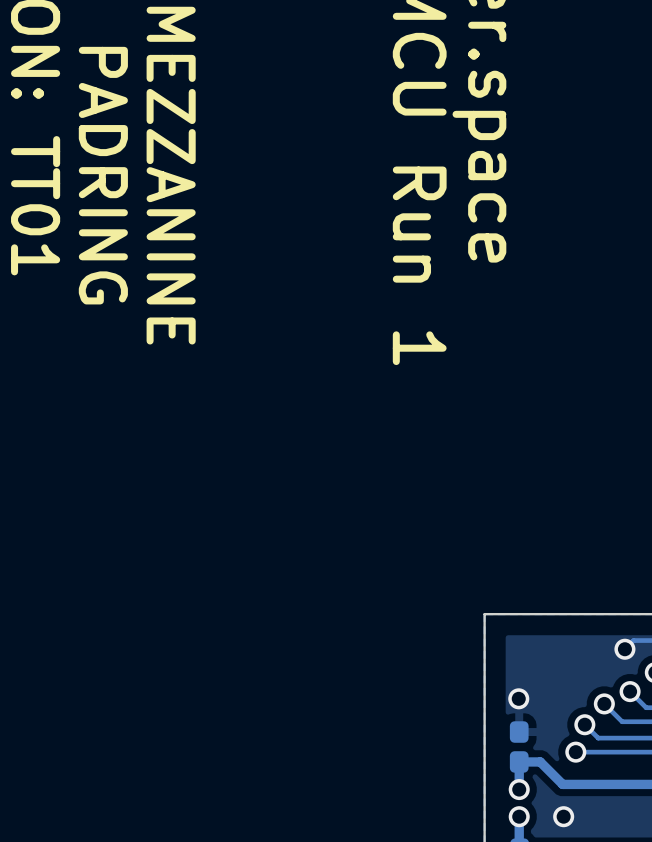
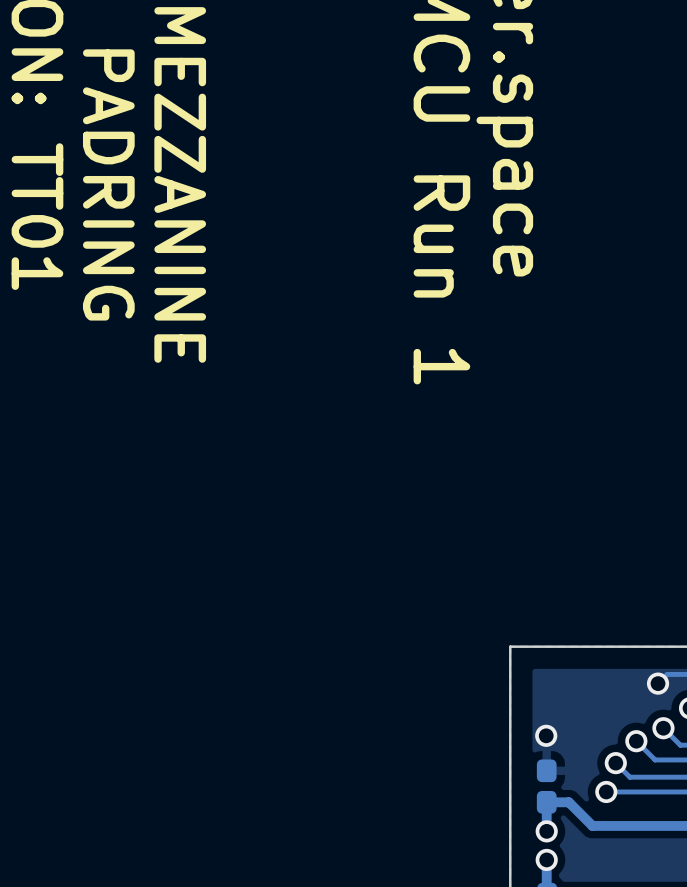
via: (563, 816) -> none

